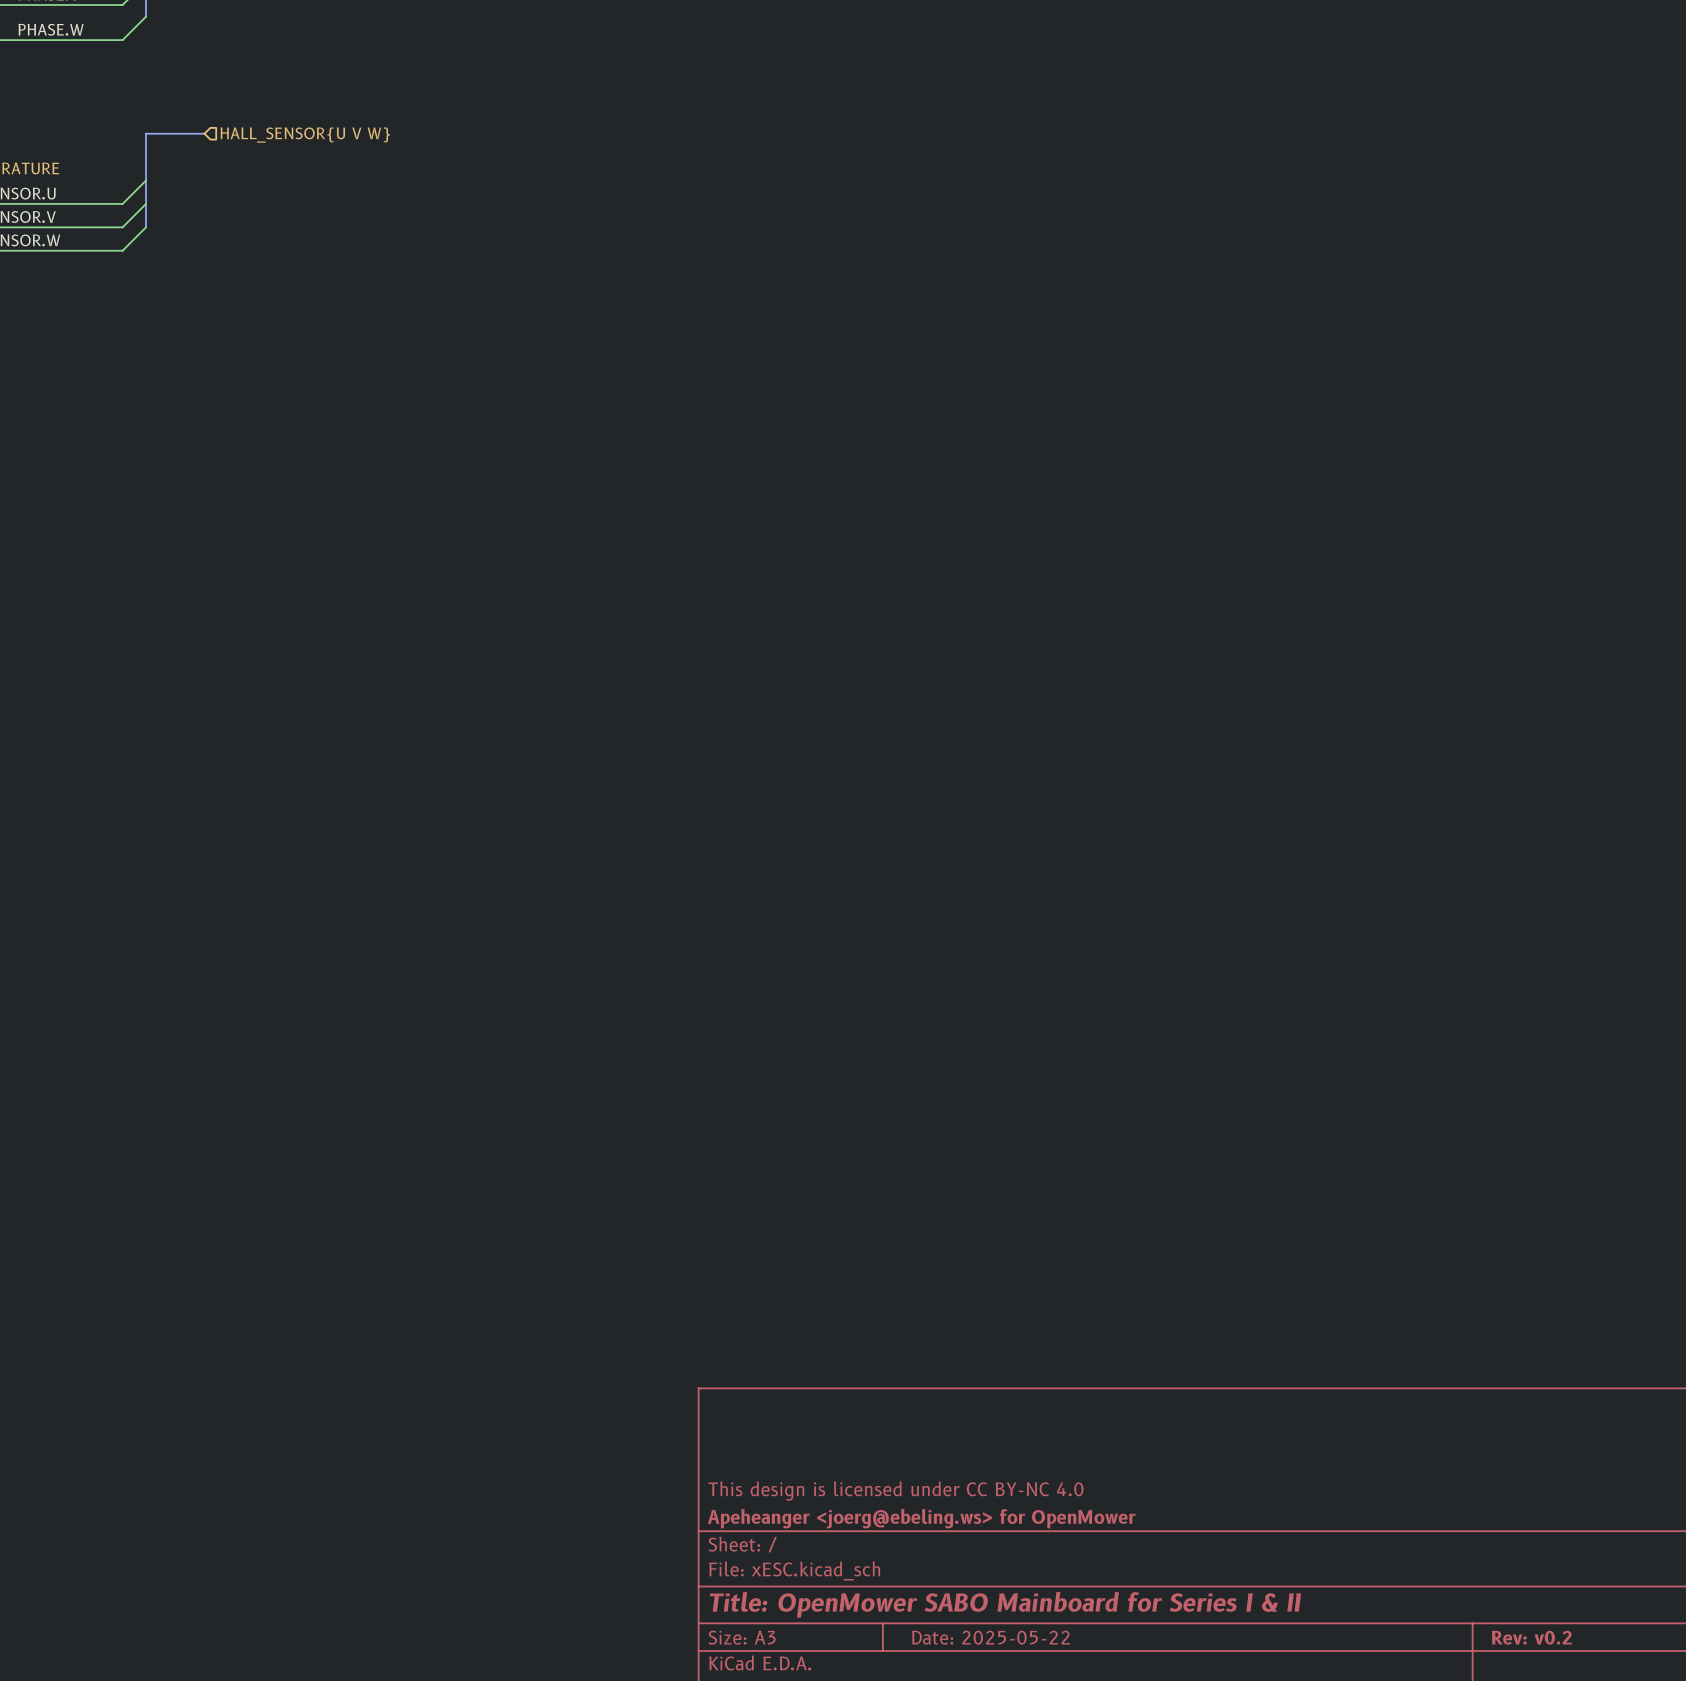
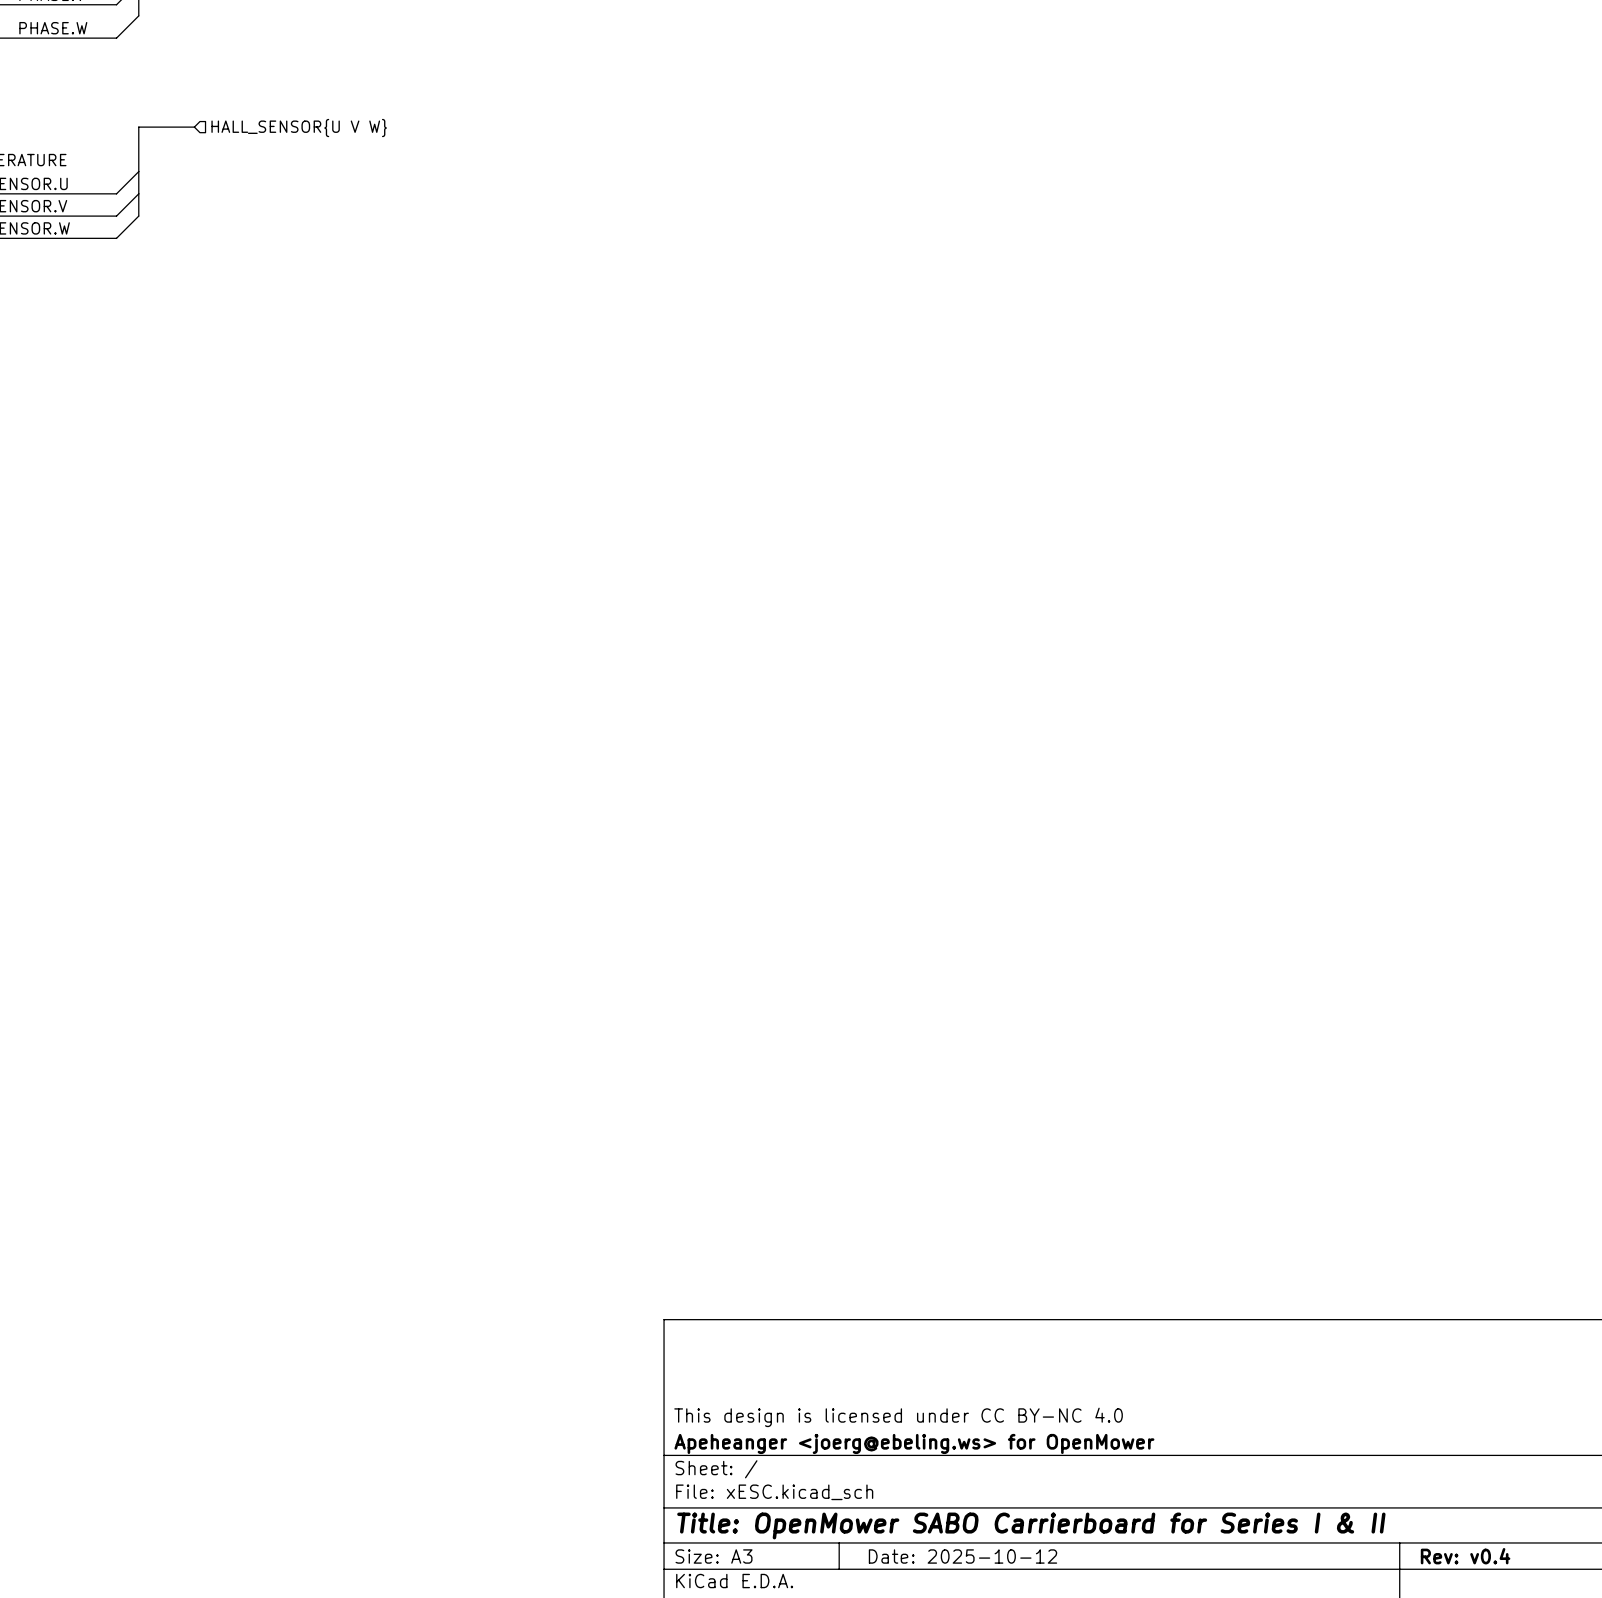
title block: Title: OpenMower SABO Mainboard for Series I & II (1005, 1604) -> Title: OpenMower SABO Carrierboard for Series I & II (1031, 1525)
title block: Date: 2025-05-22 (990, 1637) -> Date: 2025-10-12 (963, 1556)
title block: Rev: v0.2 (1531, 1637) -> Rev: v0.4 (1465, 1556)

